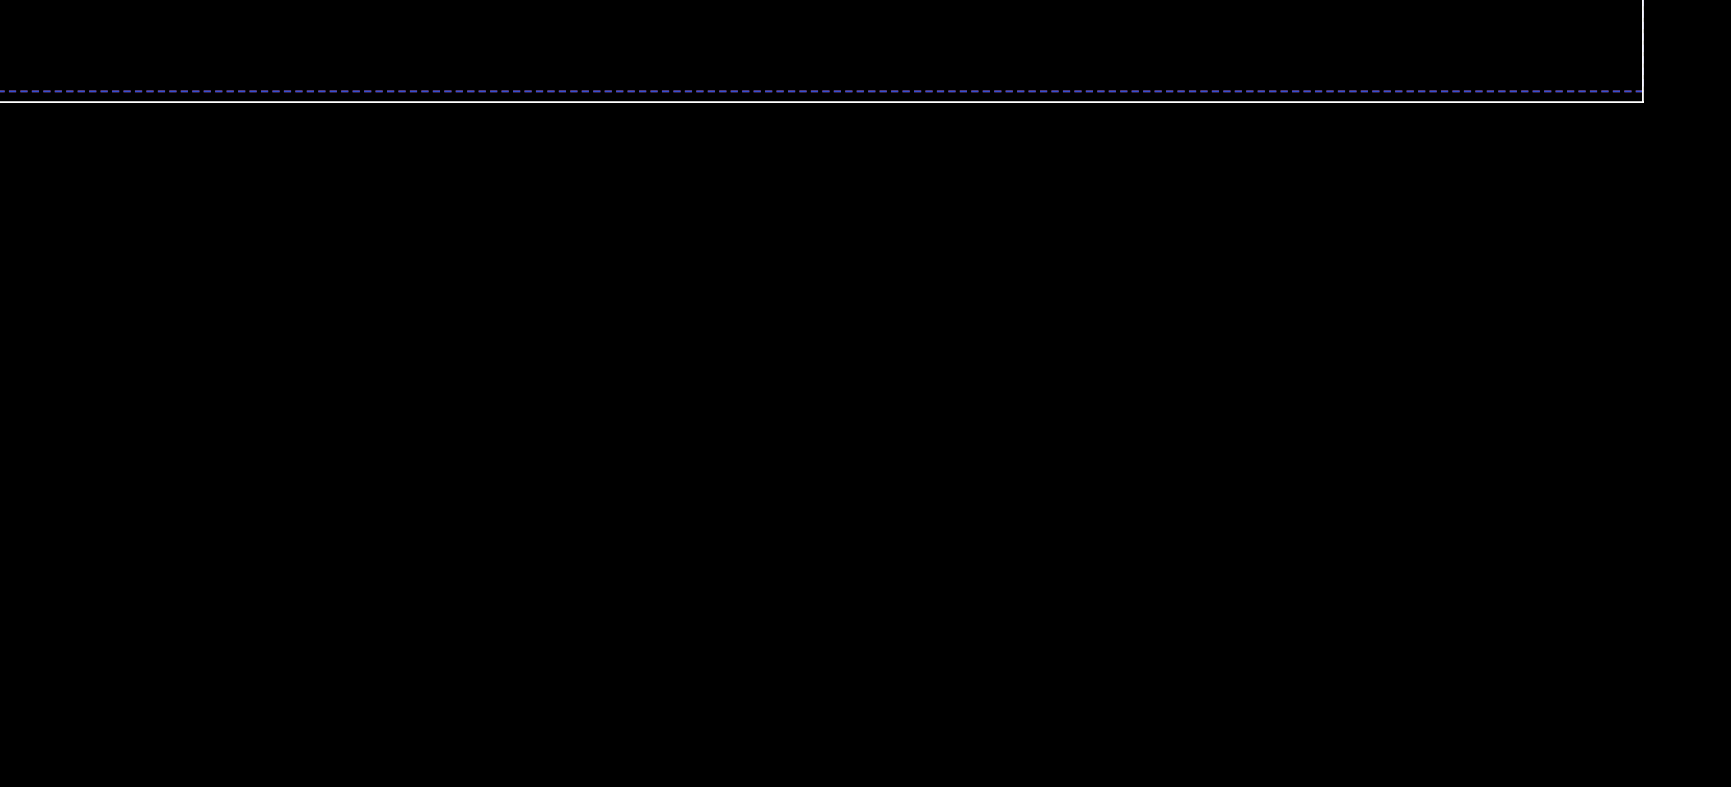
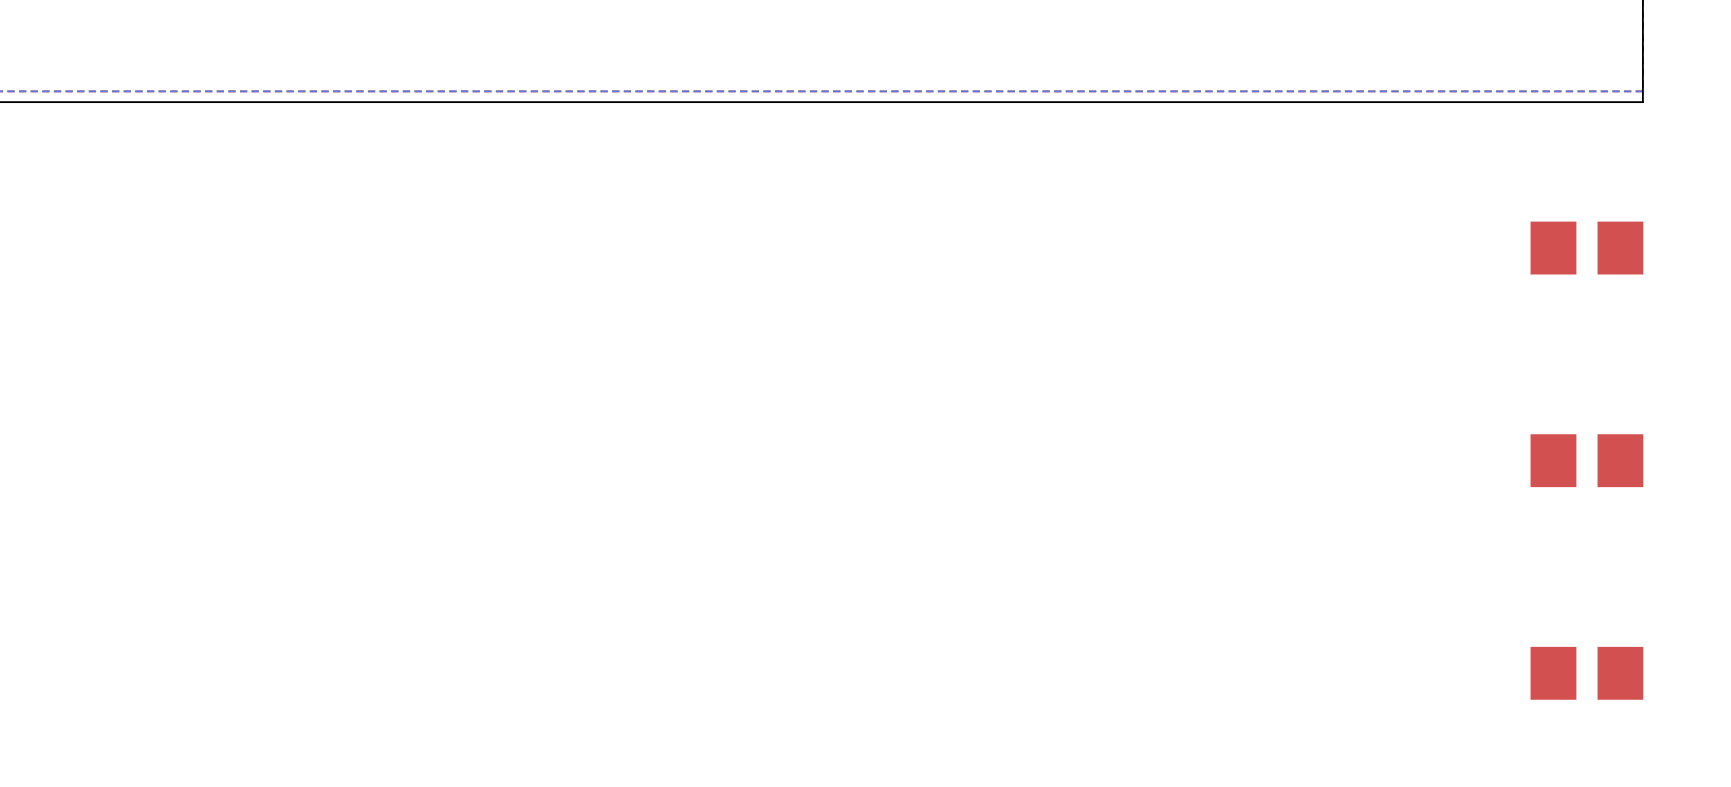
part: none -> (1586, 248)
part: none -> (1586, 460)
part: none -> (1586, 673)

